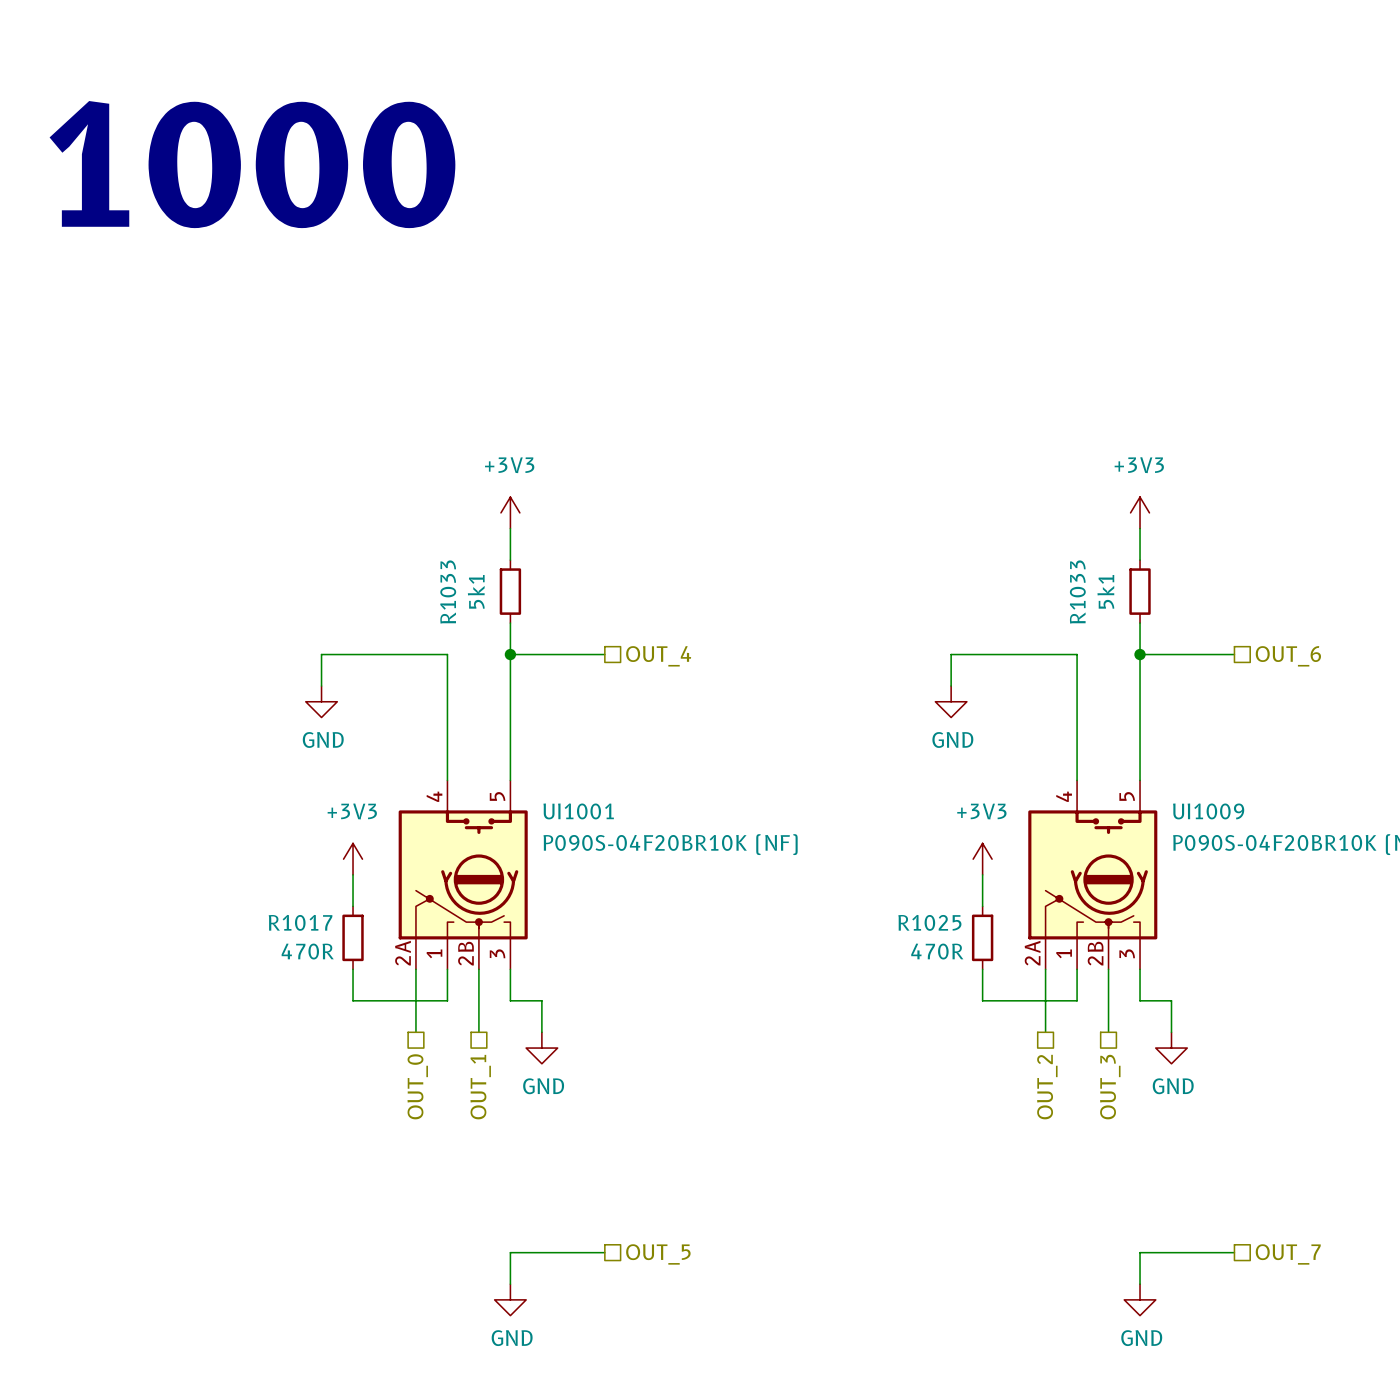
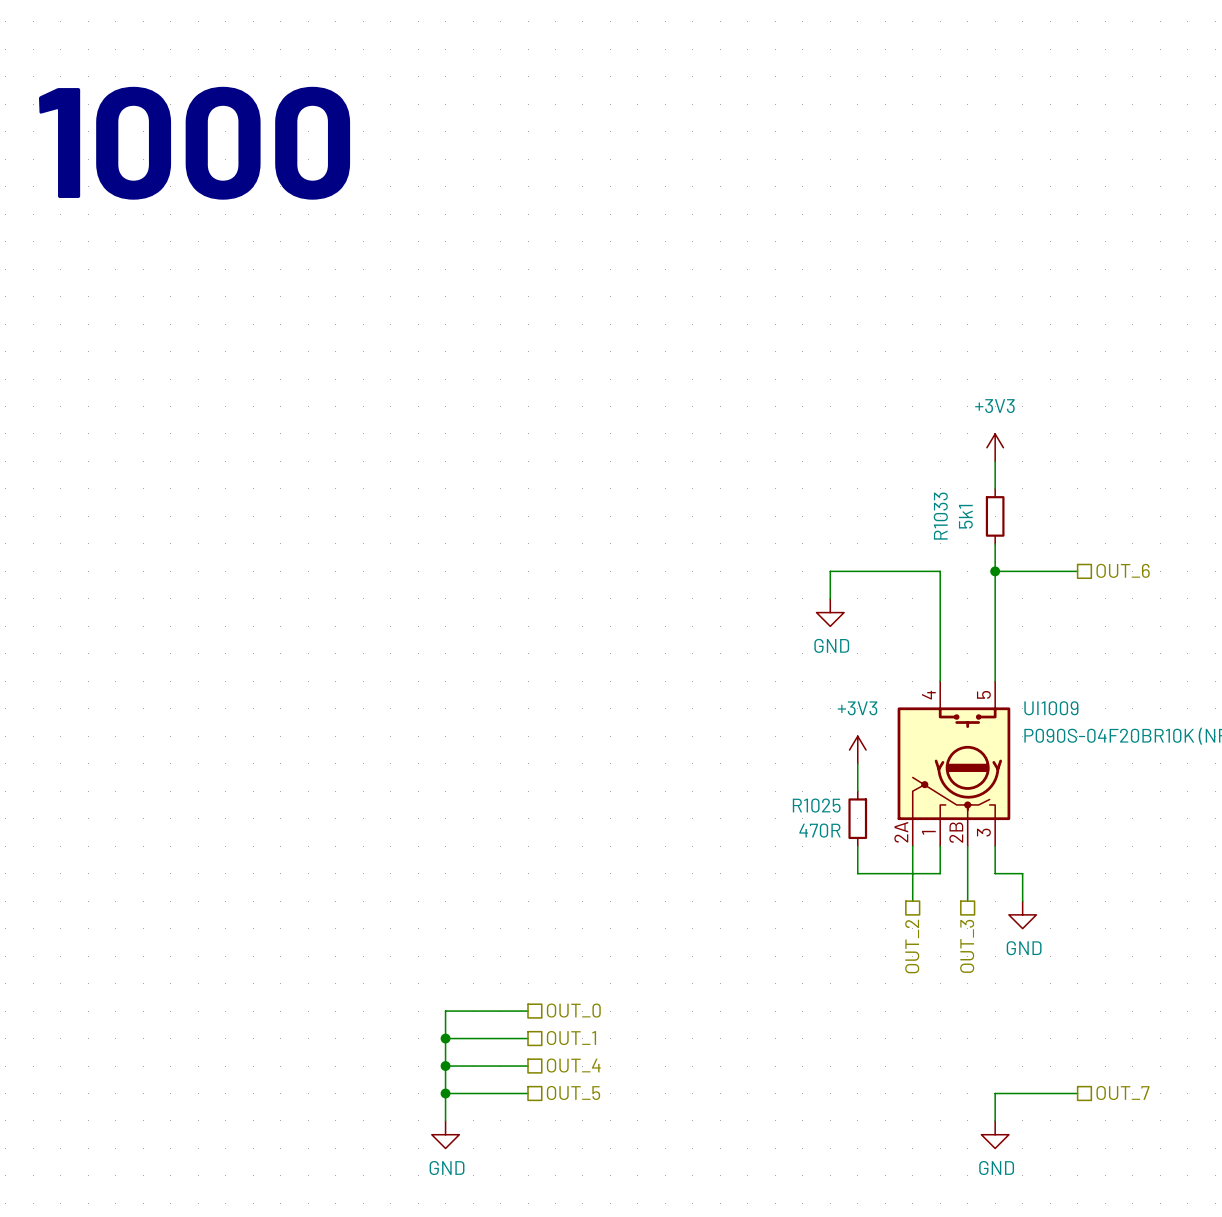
power symbol: +3V3 (510, 512) -> none
wire: (510, 528) (510, 560) -> none
R1033: 5k1 (510, 591) -> none
wire: (510, 623) (510, 780) -> none
wire: (510, 654) (604, 654) -> none
junction: (510, 654) -> none
hierarchical label: OUT_4 (658, 656) -> none
wire: (321, 686) (321, 654) (447, 654) (447, 780) -> none
power symbol: GND (321, 701) -> none
power symbol: +3V3 (353, 859) -> none
wire: (353, 874) (353, 906) -> none
UI1001: P090S-04F20BR10K (NF) (463, 874) -> none
R1017: 470R (353, 937) -> none
wire: (353, 969) (353, 1000) (447, 1000) (447, 969) -> none
wire: (415, 969) (415, 1032) -> none
wire: (478, 969) (478, 1032) -> none
wire: (510, 969) (510, 1000) (541, 1000) (541, 1032) -> none
power symbol: GND (541, 1048) -> none
hierarchical label rotation: 0° (417, 1086) -> 90° counterclockwise (573, 1010)
hierarchical label position: OUT_0 (417, 1086) -> OUT_0 (573, 1010)
hierarchical label rotation: 0° (480, 1087) -> 90° counterclockwise (571, 1038)
hierarchical label position: OUT_1 (480, 1087) -> OUT_1 (571, 1038)
wire: none -> (528, 1011) (445, 1011) (445, 1093)
wire: none -> (445, 1038) (528, 1038)
junction: none -> (445, 1038)
wire: none -> (445, 1066) (528, 1066)
junction: none -> (445, 1066)
hierarchical label: none -> OUT_4 (573, 1065)
junction: none -> (445, 1093)

